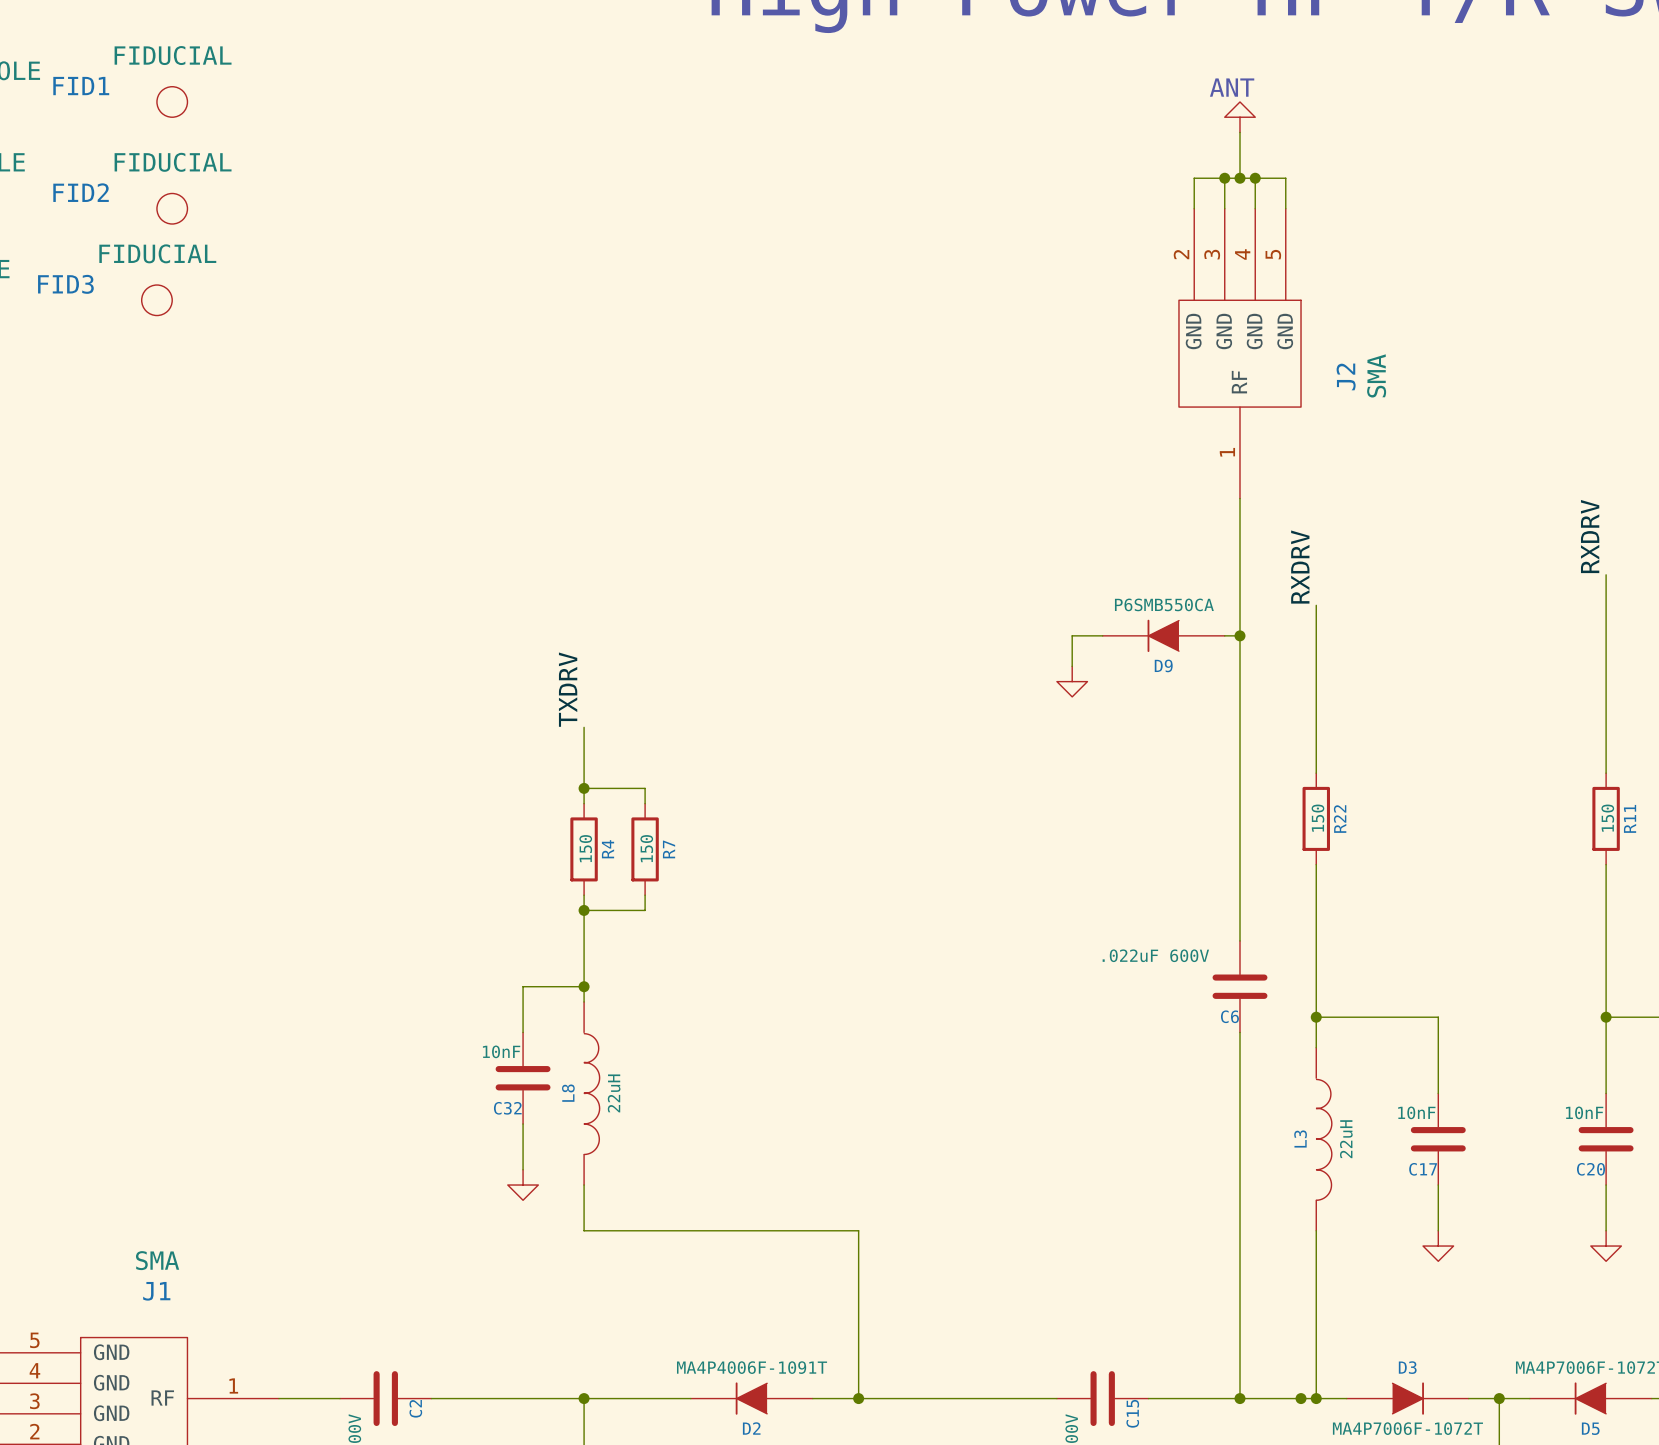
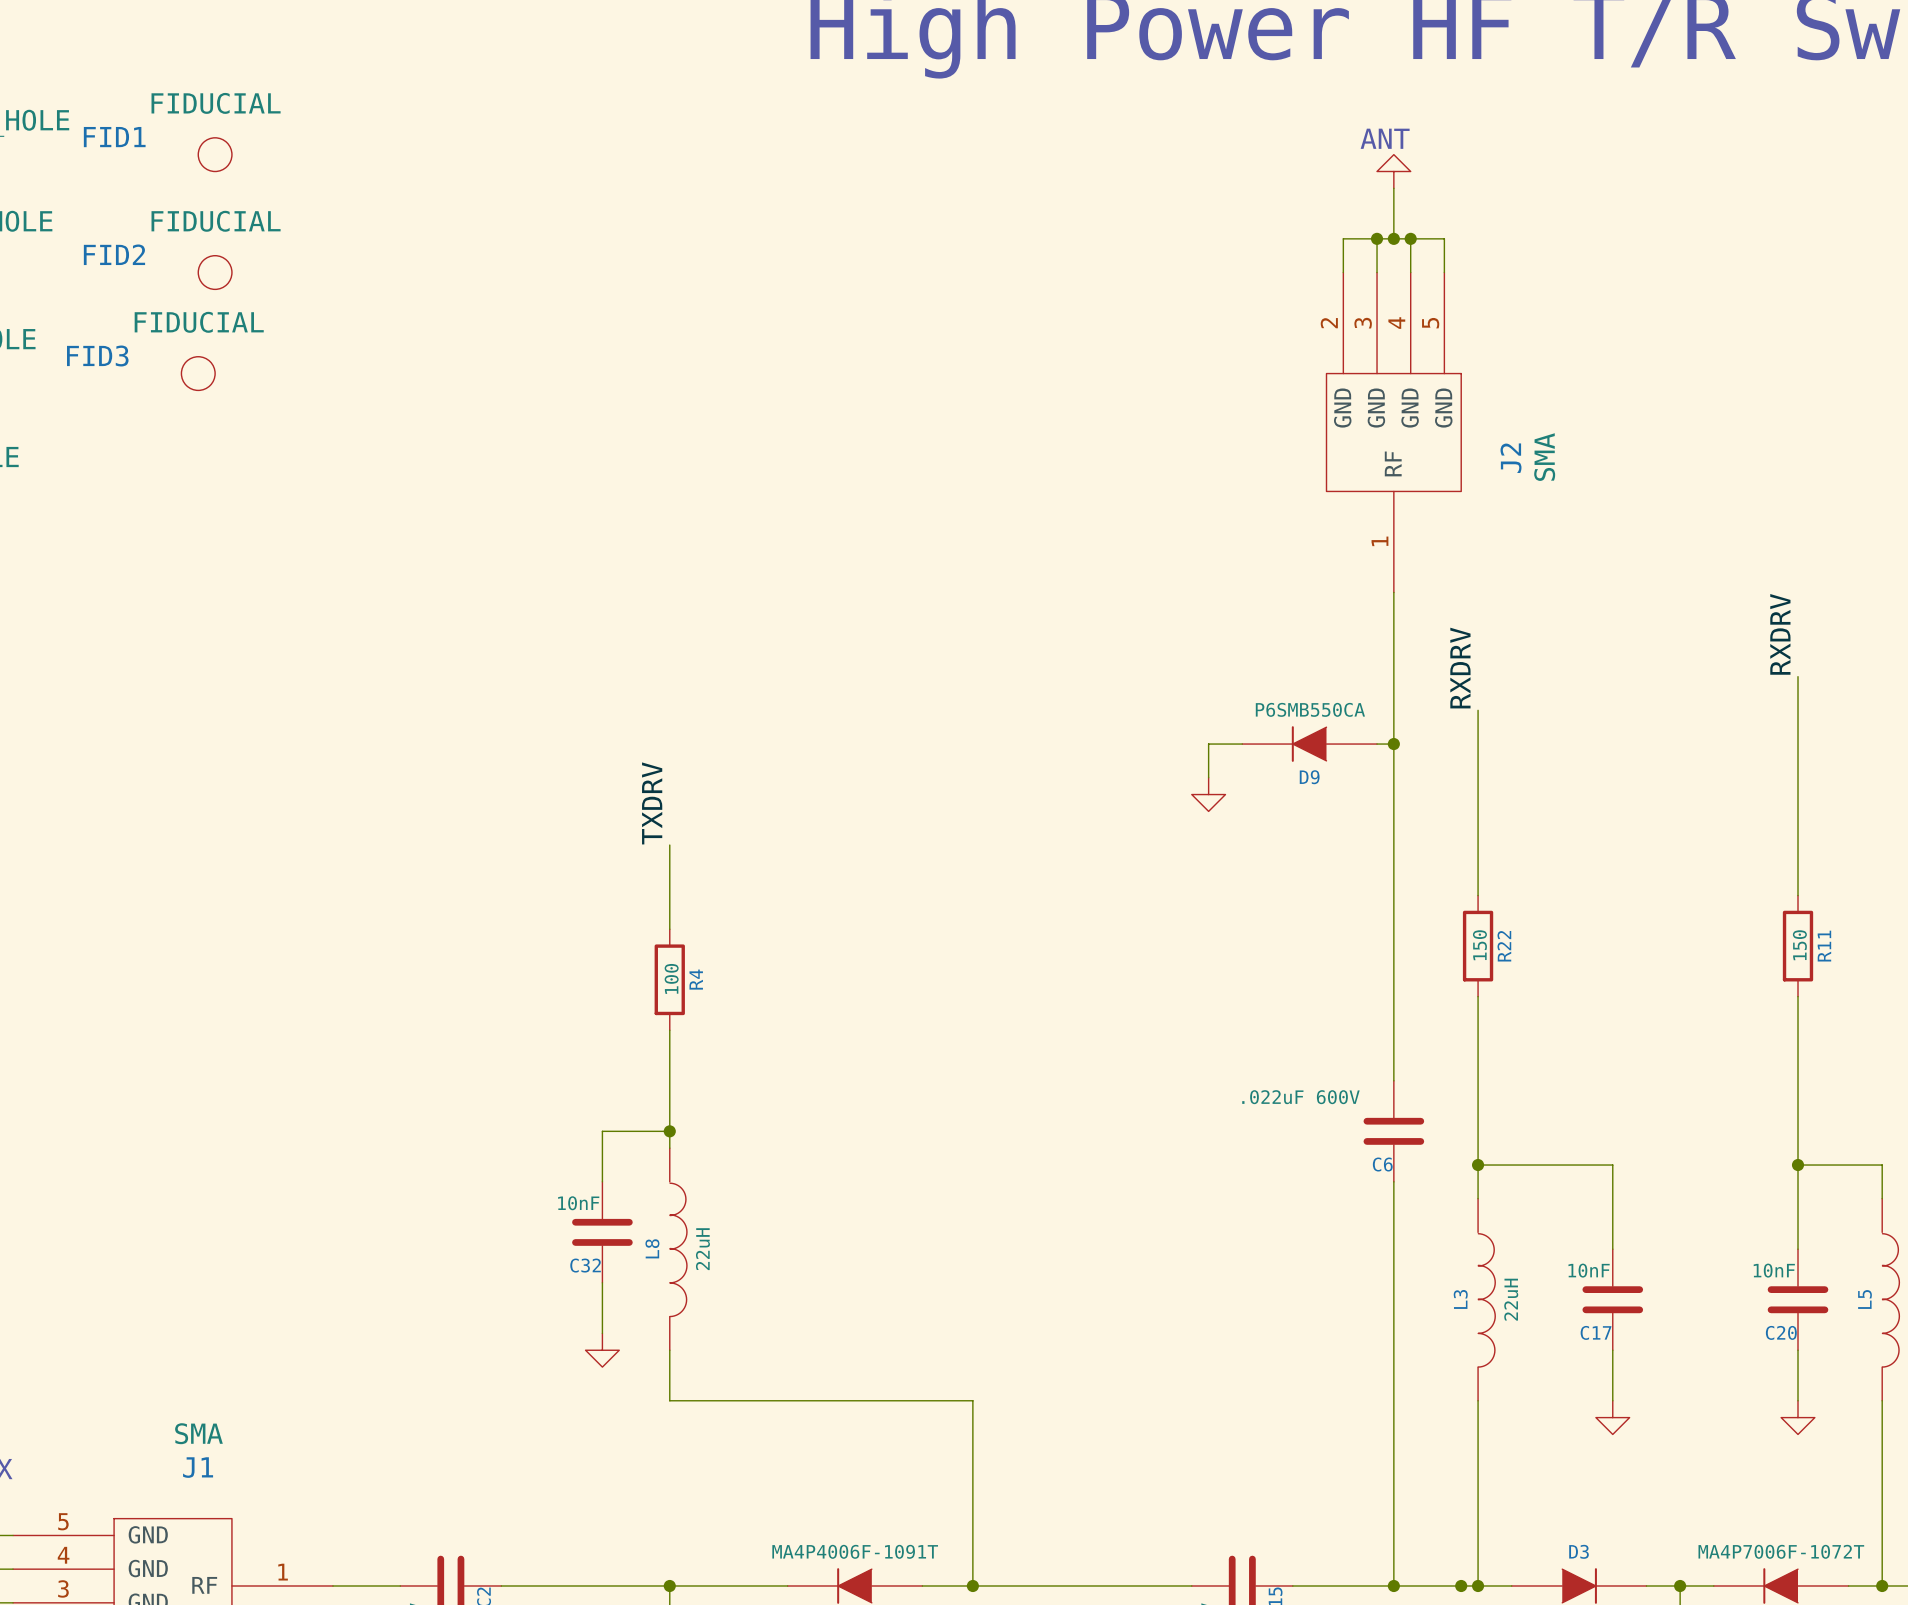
wire: (584, 788) (645, 788) (645, 803) -> none
junction: (584, 788) -> none
R4 value: 150 (585, 848) -> 100 (671, 978)
R7: 150 (645, 849) -> none
wire: (645, 895) (645, 910) (584, 910) -> none
junction: (584, 910) -> none

